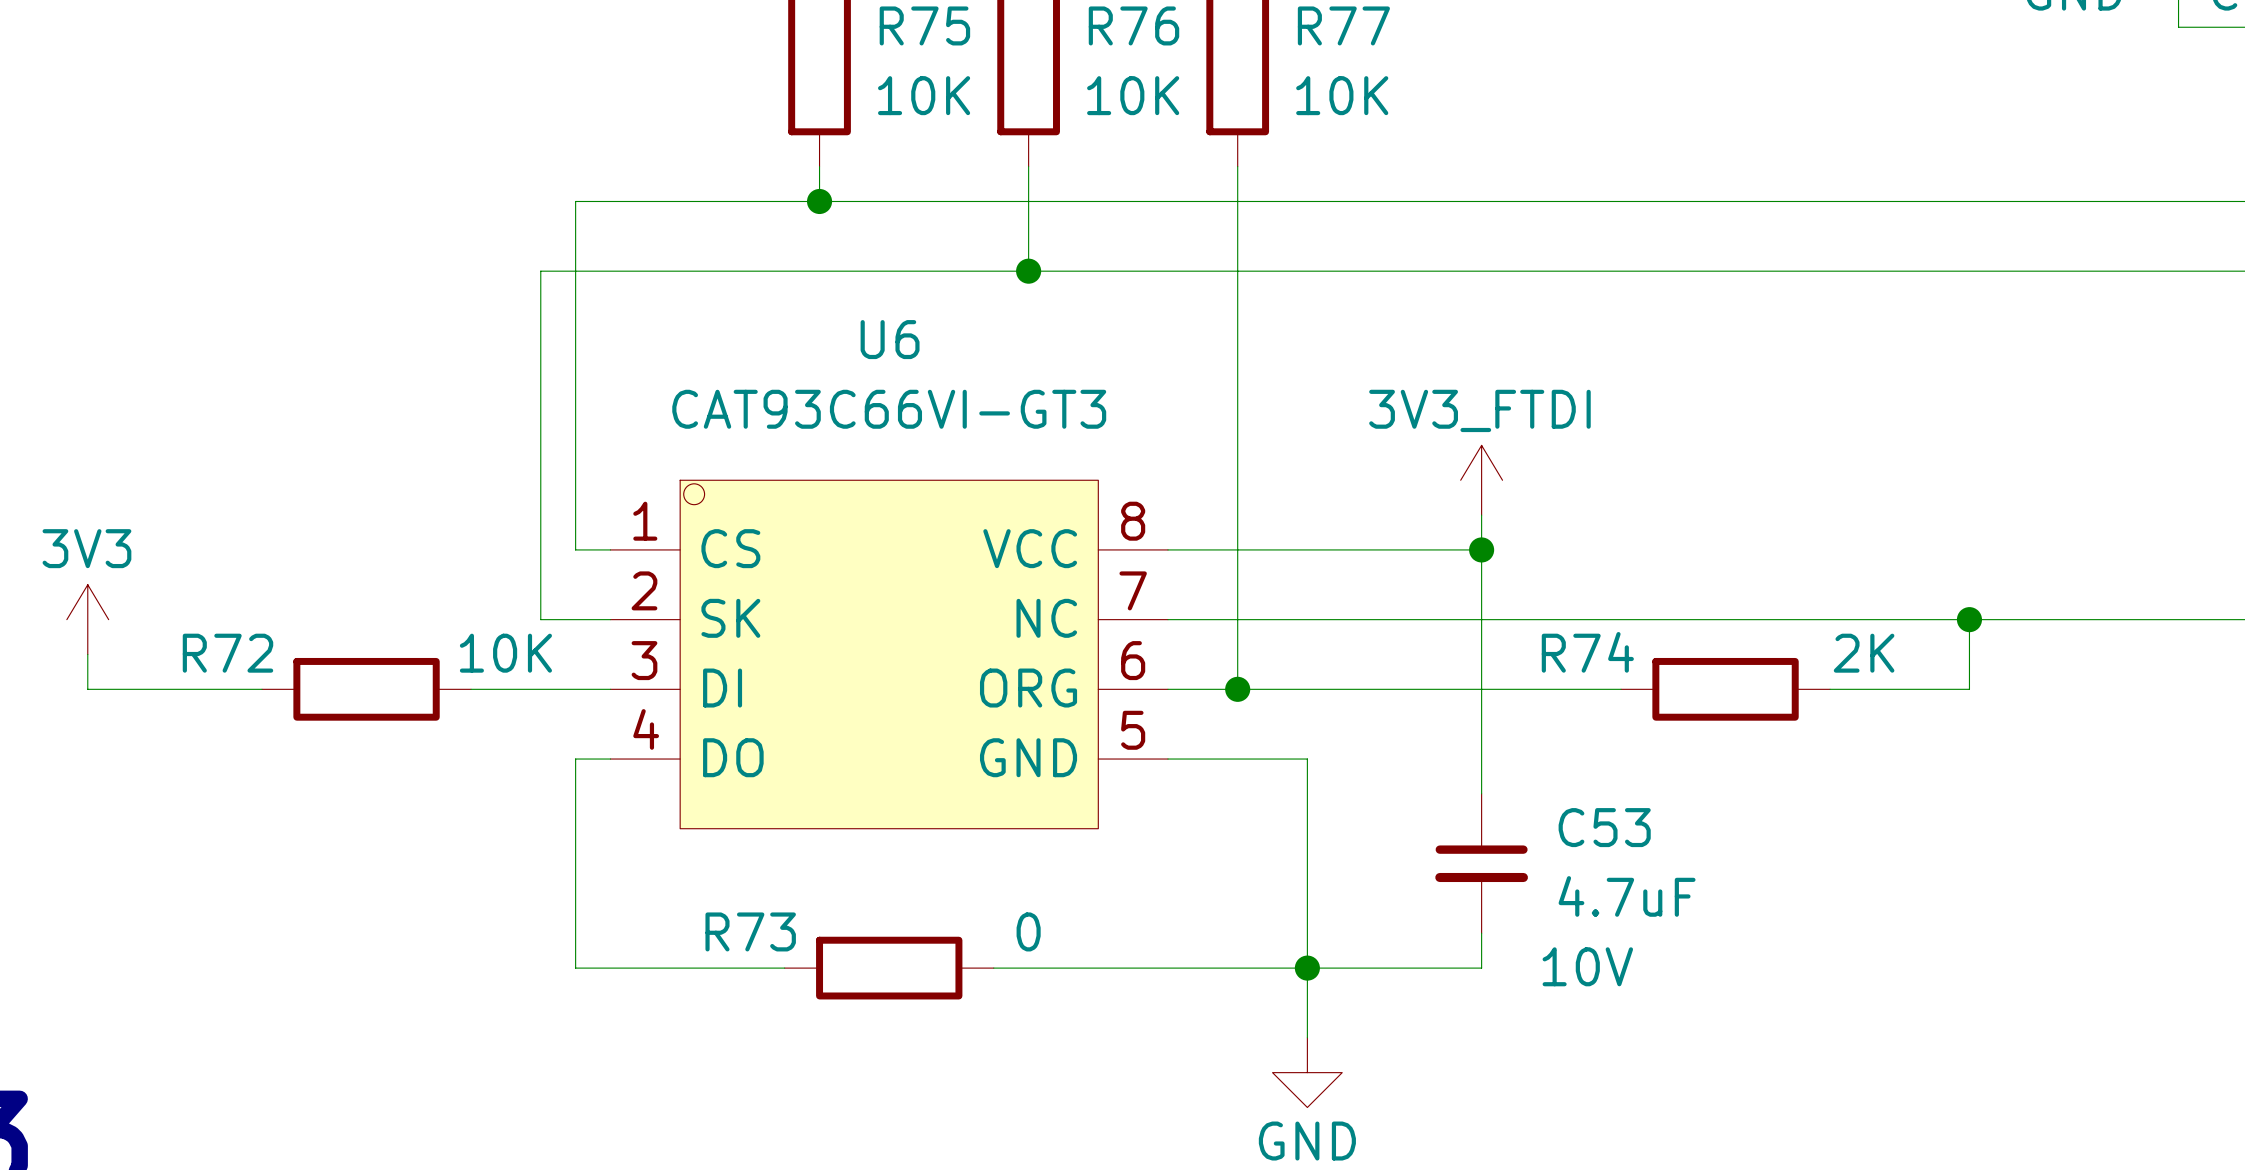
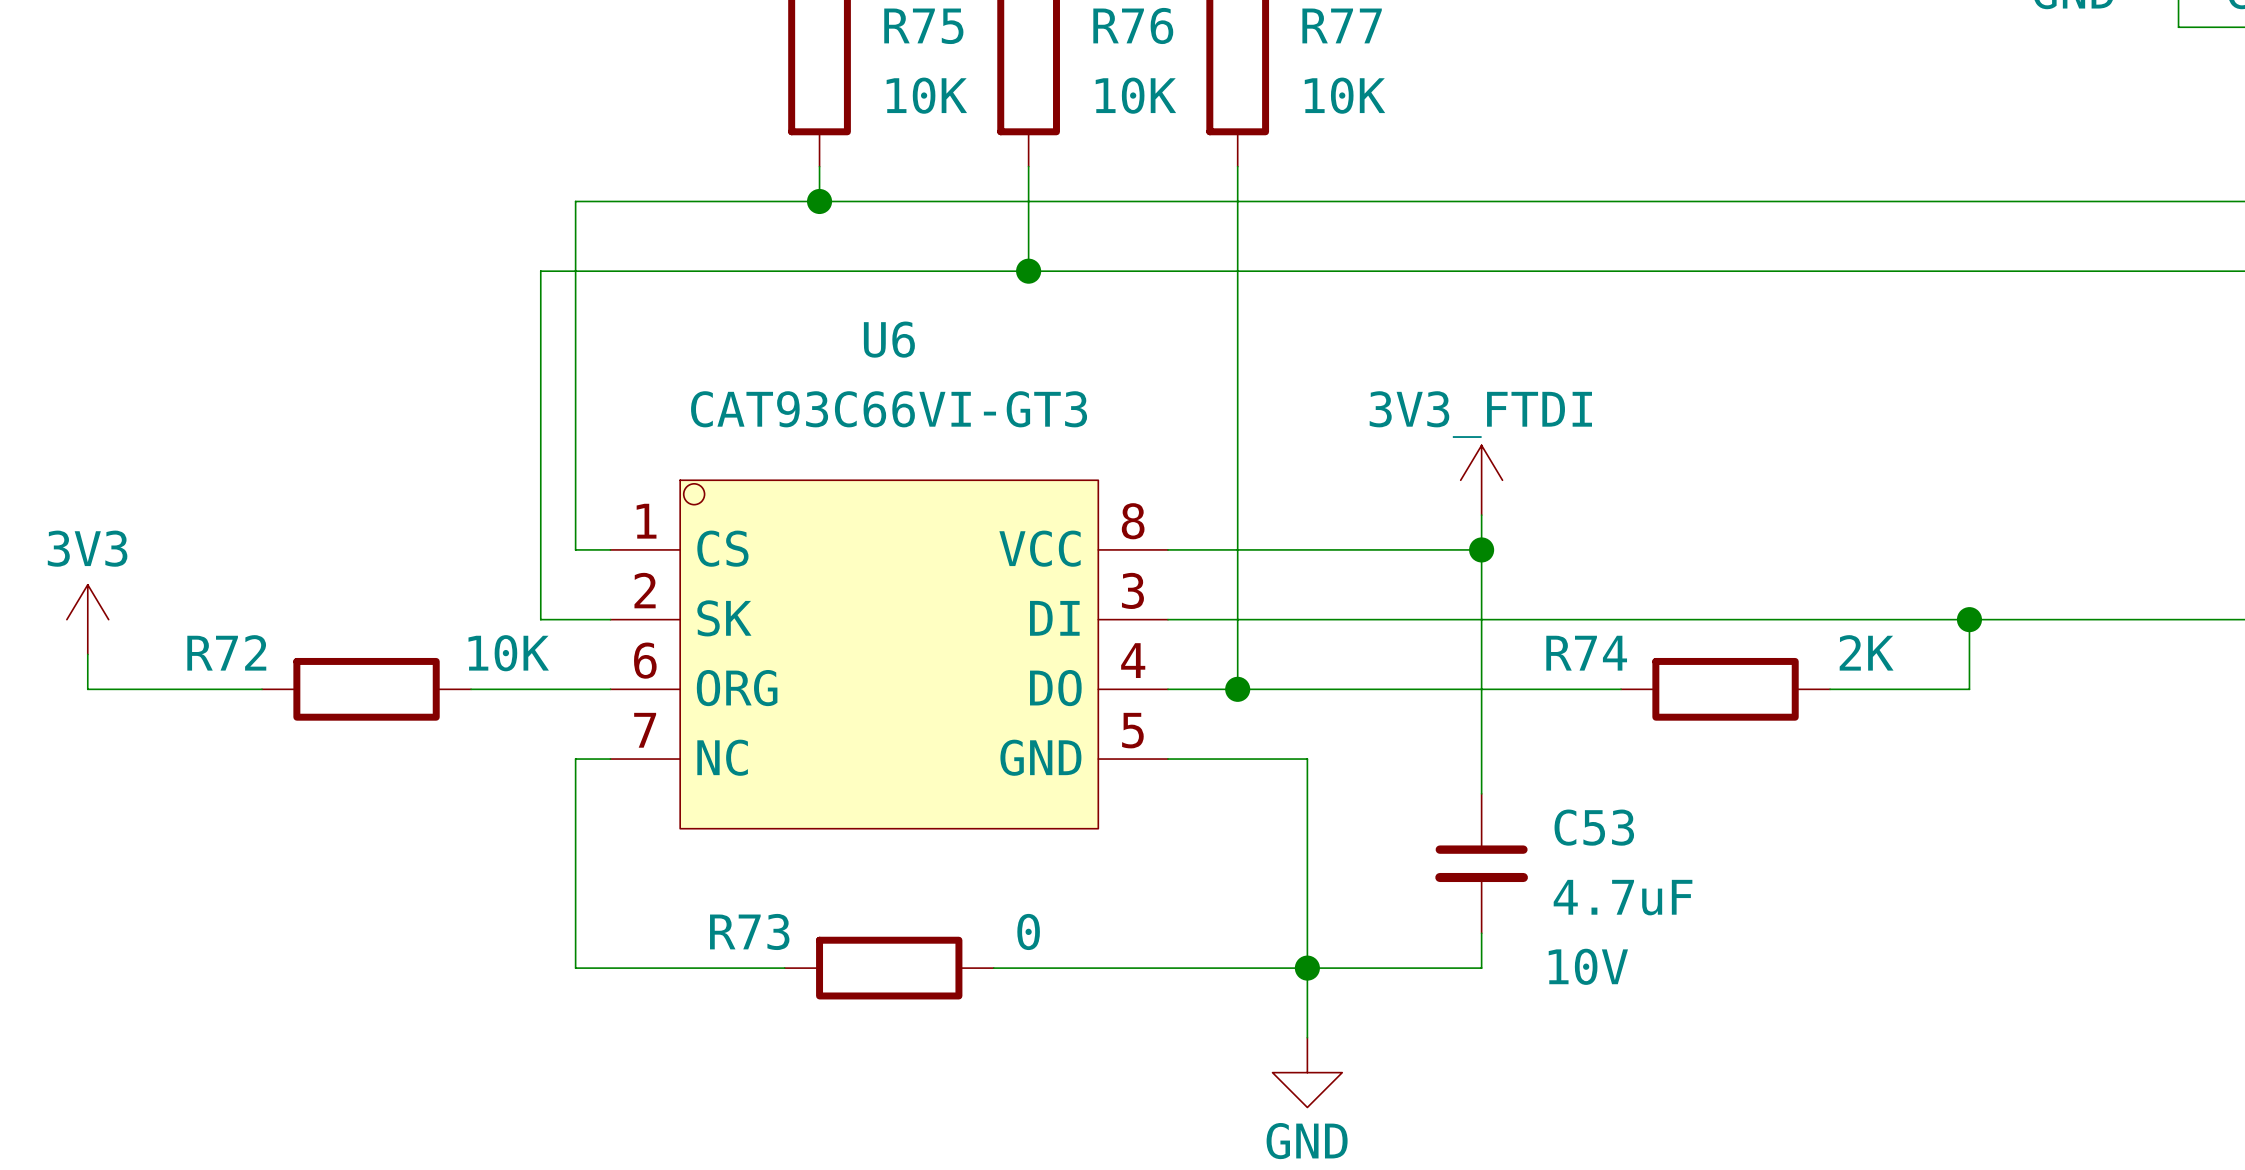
U6 pin number: 7 (1133, 590) -> 3 (1132, 590)
U6 pin name: NC (1046, 618) -> DI (1054, 618)
U6 pin number: 3 (644, 660) -> 6 (645, 660)
U6 pin number: 6 (1133, 660) -> 4 (1133, 660)
U6 pin name: DI (722, 688) -> ORG (737, 688)
U6 pin name: ORG (1028, 688) -> DO (1055, 688)
U6 pin number: 4 (646, 729) -> 7 (645, 730)
U6 pin name: DO (733, 757) -> NC (722, 757)

